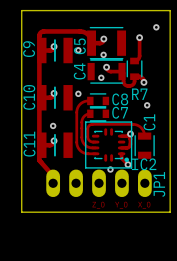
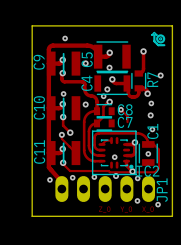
line: none -> (154, 32) (156, 35) (151, 35) (154, 32)
drawing: none -> [156, 34, 166, 44]
line: none -> (154, 35) (154, 41) (156, 43)
via: none -> (65, 38)
via position: (156, 27) -> (160, 75)
line: none -> (157, 44) (164, 45)
track: none -> (62, 73) (63, 81) (84, 82) (86, 93) (96, 99) (96, 111)
via: none -> (62, 73)
via: none -> (63, 93)
via: none -> (103, 96)
track: none -> (109, 101) (103, 106) (103, 116) (96, 123)
via: none -> (109, 101)
via: none -> (151, 103)
R7 name rotation: 0° (139, 94) -> 90° counterclockwise (152, 79)
R7 name position: R7 (139, 94) -> R7 (152, 79)
track: none -> (121, 109) (127, 116) (127, 122)
via: none -> (121, 109)
track: none -> (63, 117) (63, 125) (70, 132)
via: none -> (63, 117)
via: none -> (152, 129)
via: none -> (70, 132)
track: none -> (61, 134) (61, 138) (75, 153)
track: none -> (111, 140) (105, 140) (102, 144)
track: none -> (148, 144) (153, 144) (158, 149) (158, 168) (154, 172) (70, 171) (63, 162)
via: none -> (148, 153)
via: none -> (114, 157)
via: none -> (63, 162)
via: none -> (94, 177)
via: none -> (72, 177)
via: none -> (137, 178)
via: none -> (49, 179)
via: none -> (137, 200)
via: none -> (158, 204)

